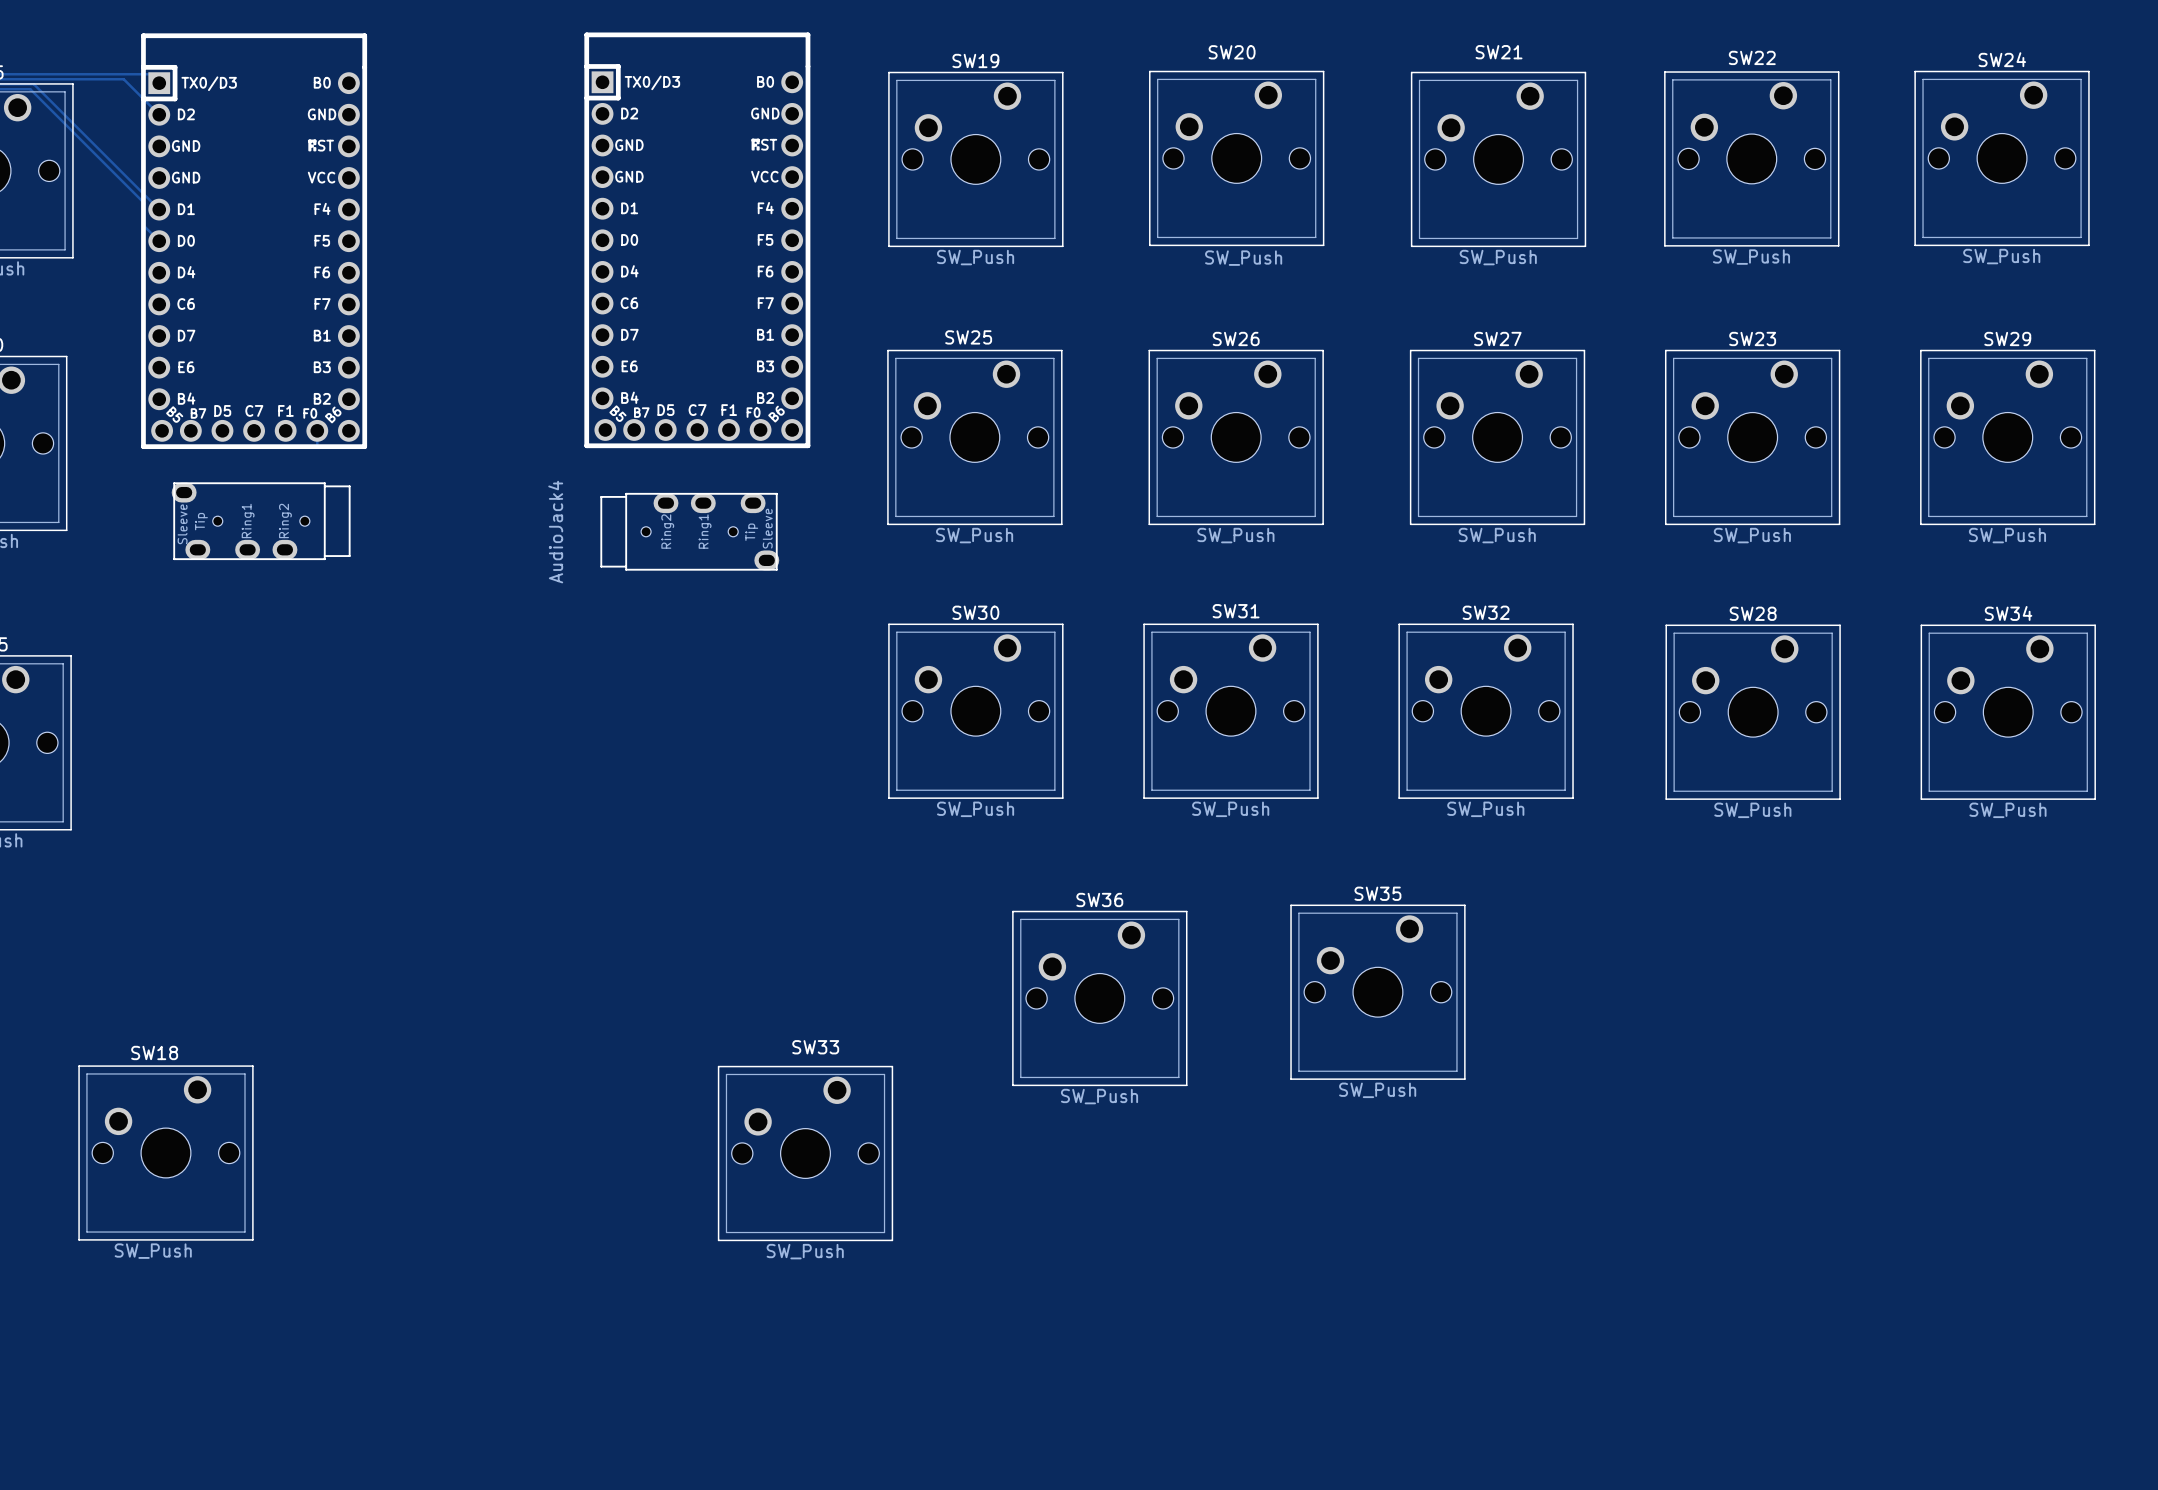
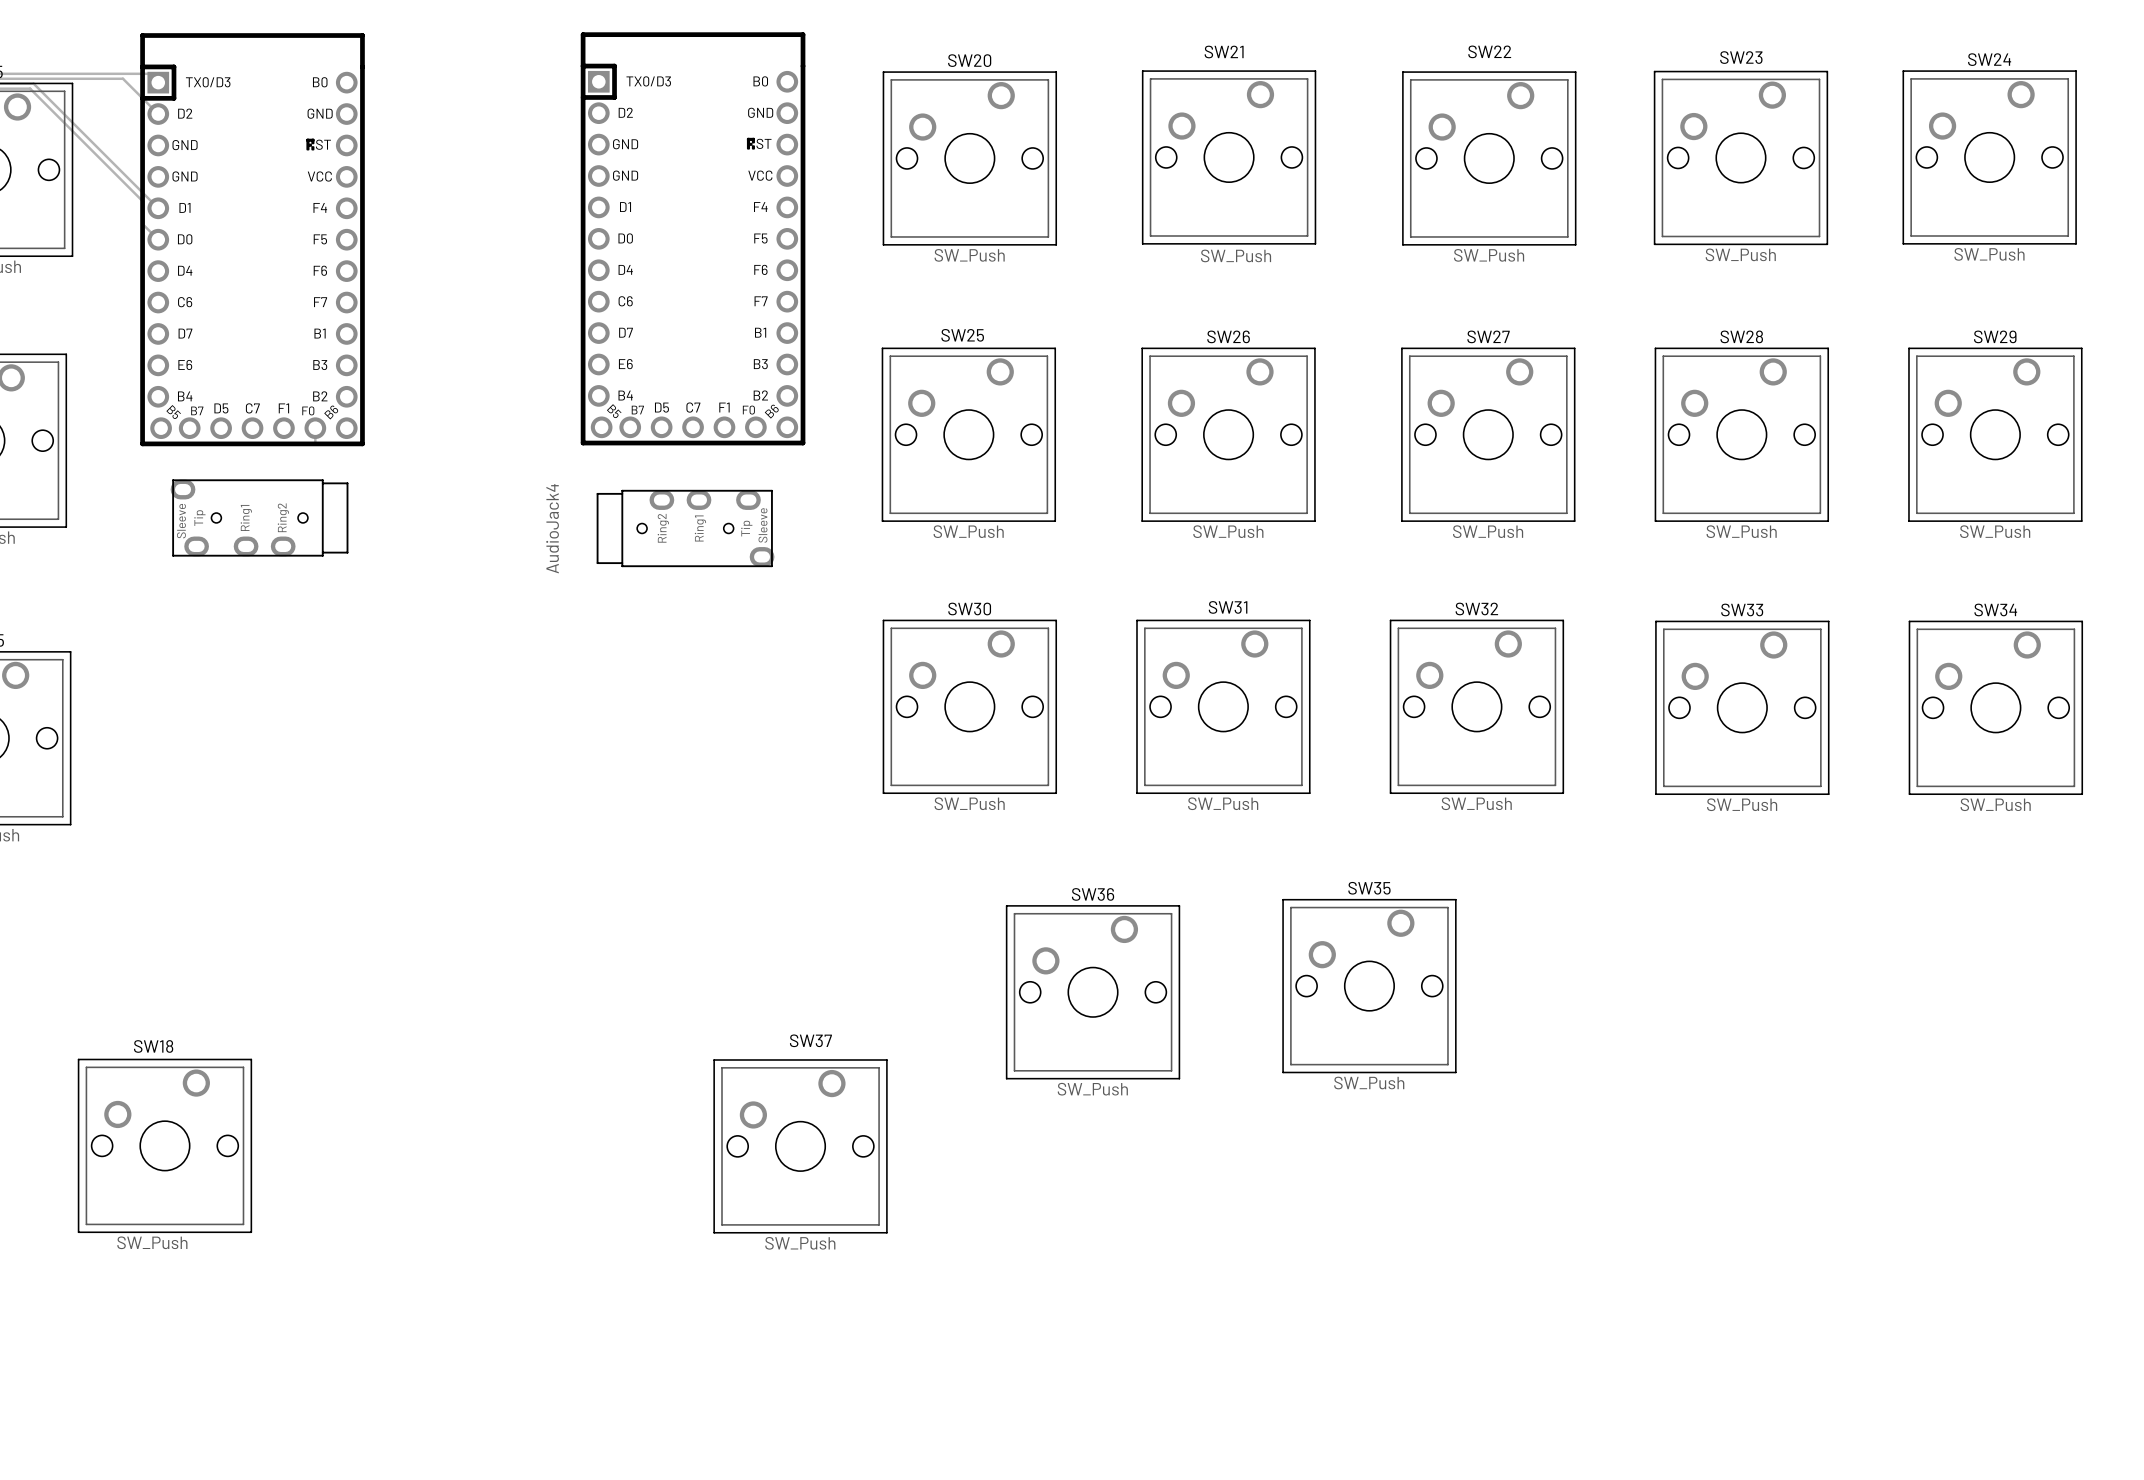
SW20 name: SW20 (1232, 52) -> SW21 (1224, 51)
SW21 name: SW21 (1499, 52) -> SW22 (1489, 51)
SW22 name: SW22 (1752, 57) -> SW23 (1741, 57)
SW19 name: SW19 (975, 60) -> SW20 (969, 60)
SW23 name: SW23 (1752, 338) -> SW28 (1741, 336)
SW28 name: SW28 (1753, 613) -> SW33 (1742, 609)
SW33 name: SW33 (815, 1047) -> SW37 (810, 1040)

